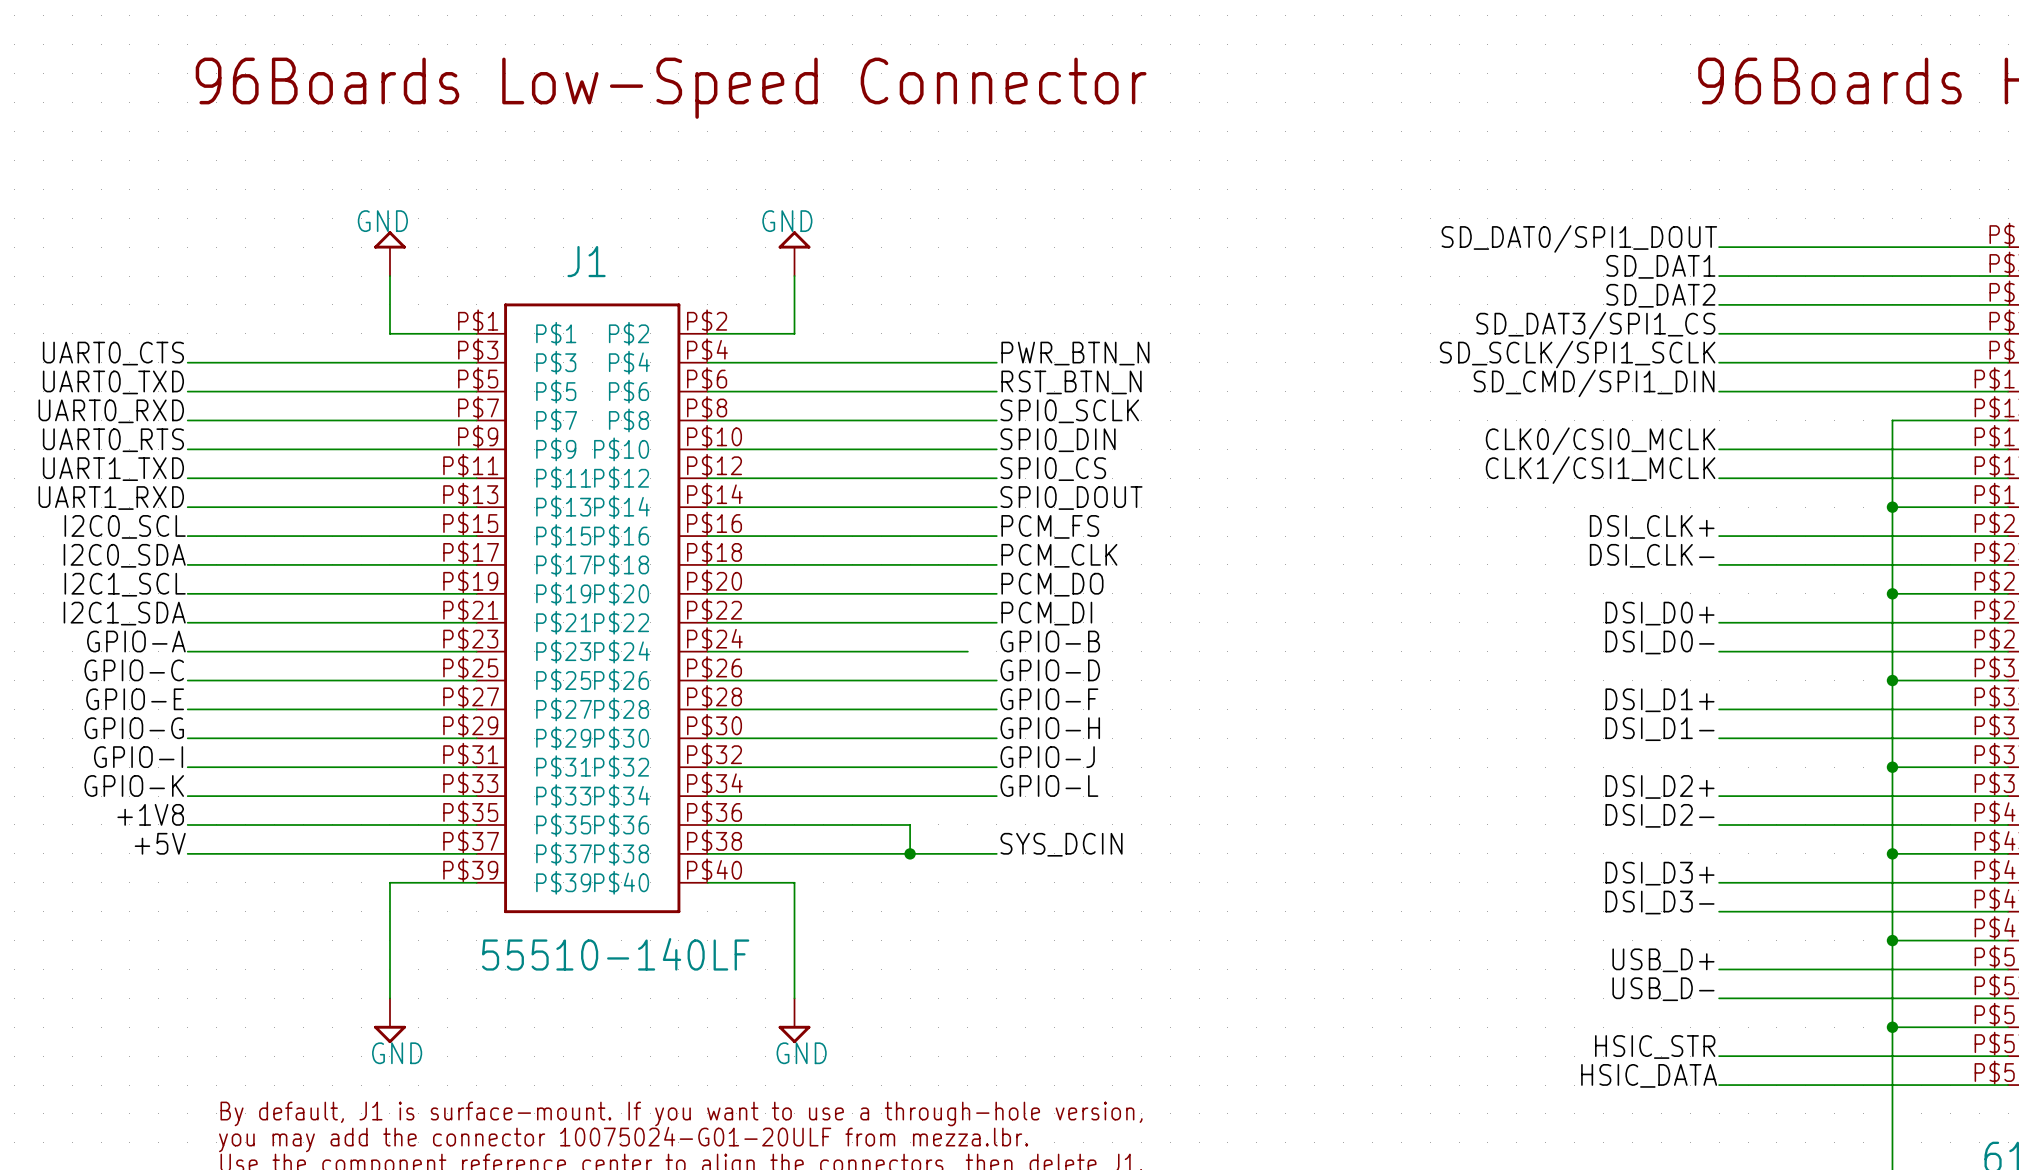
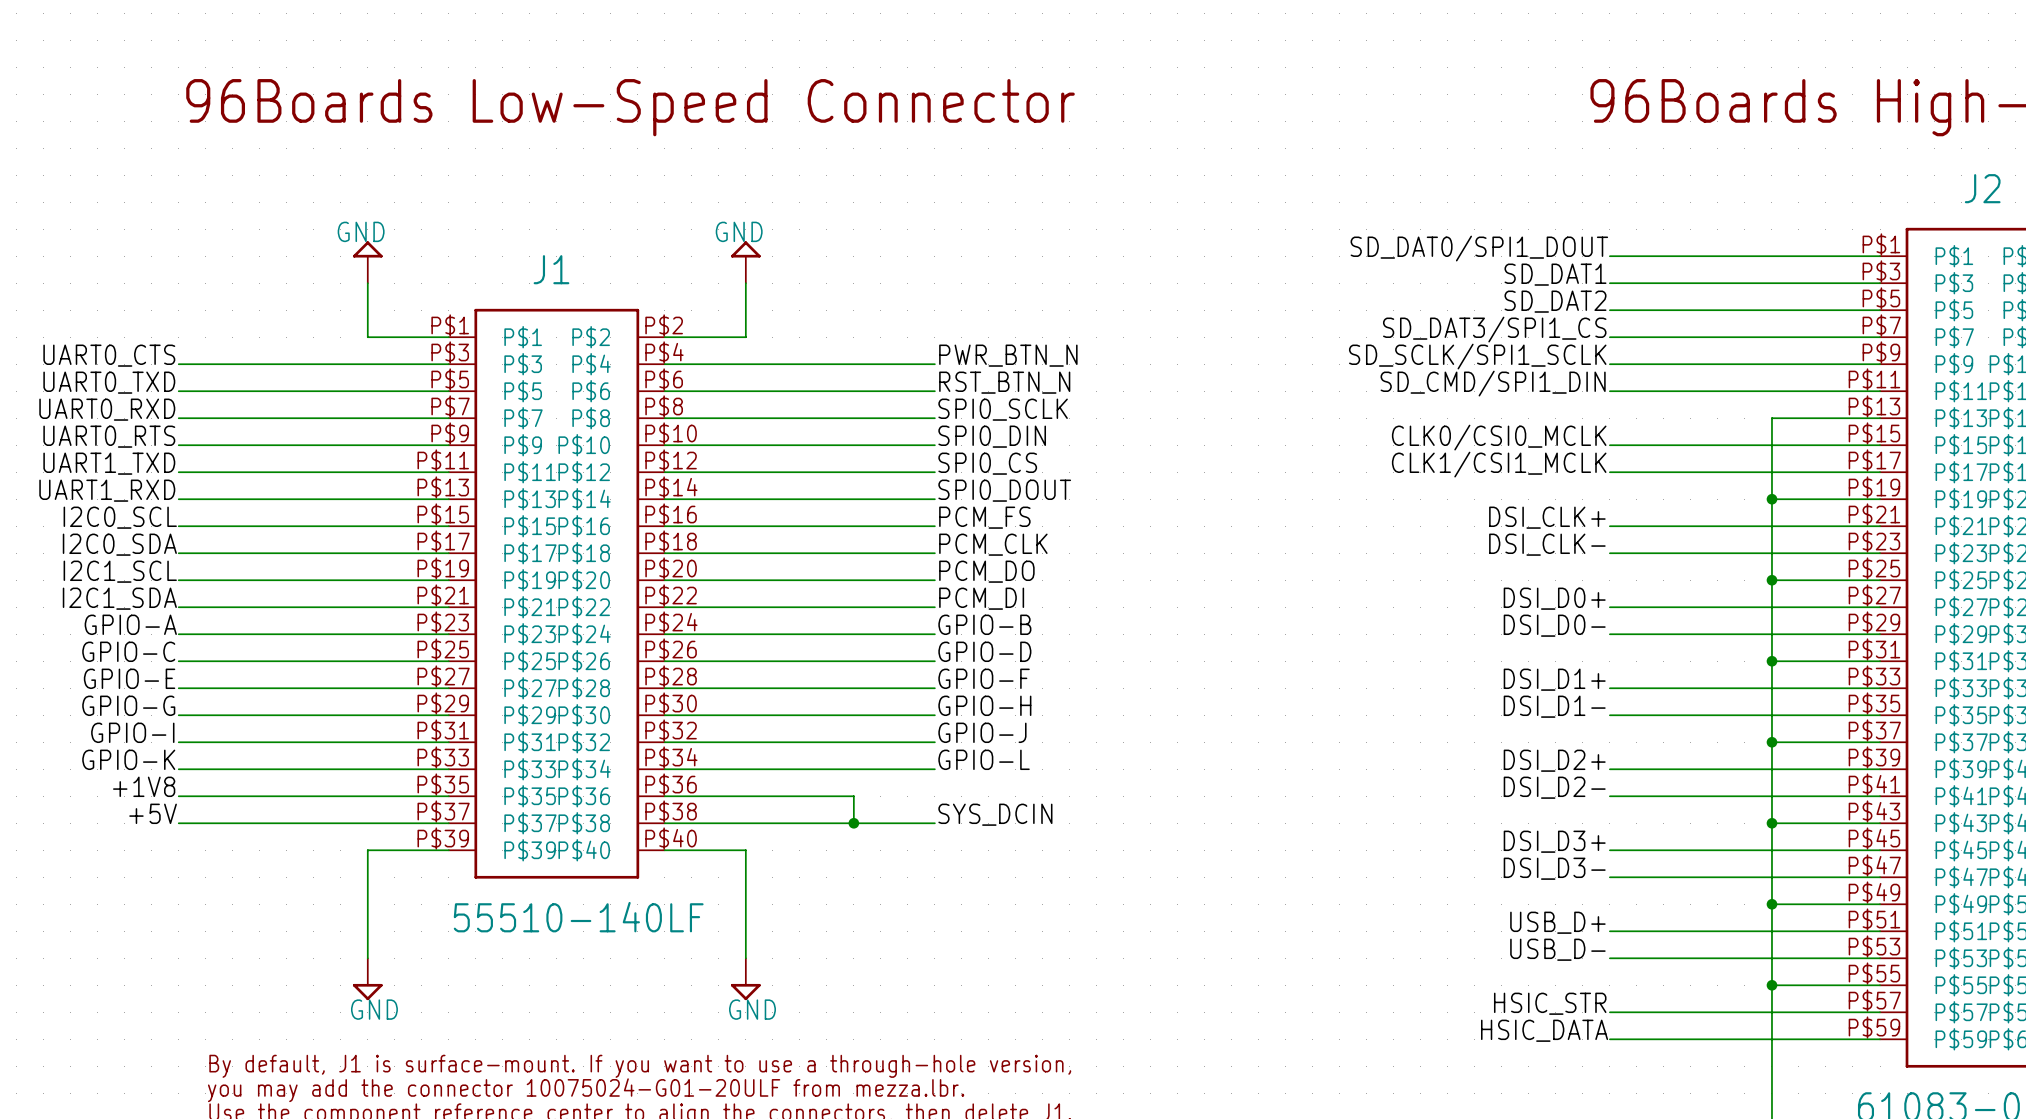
wire: none -> (907, 634) (934, 634)

